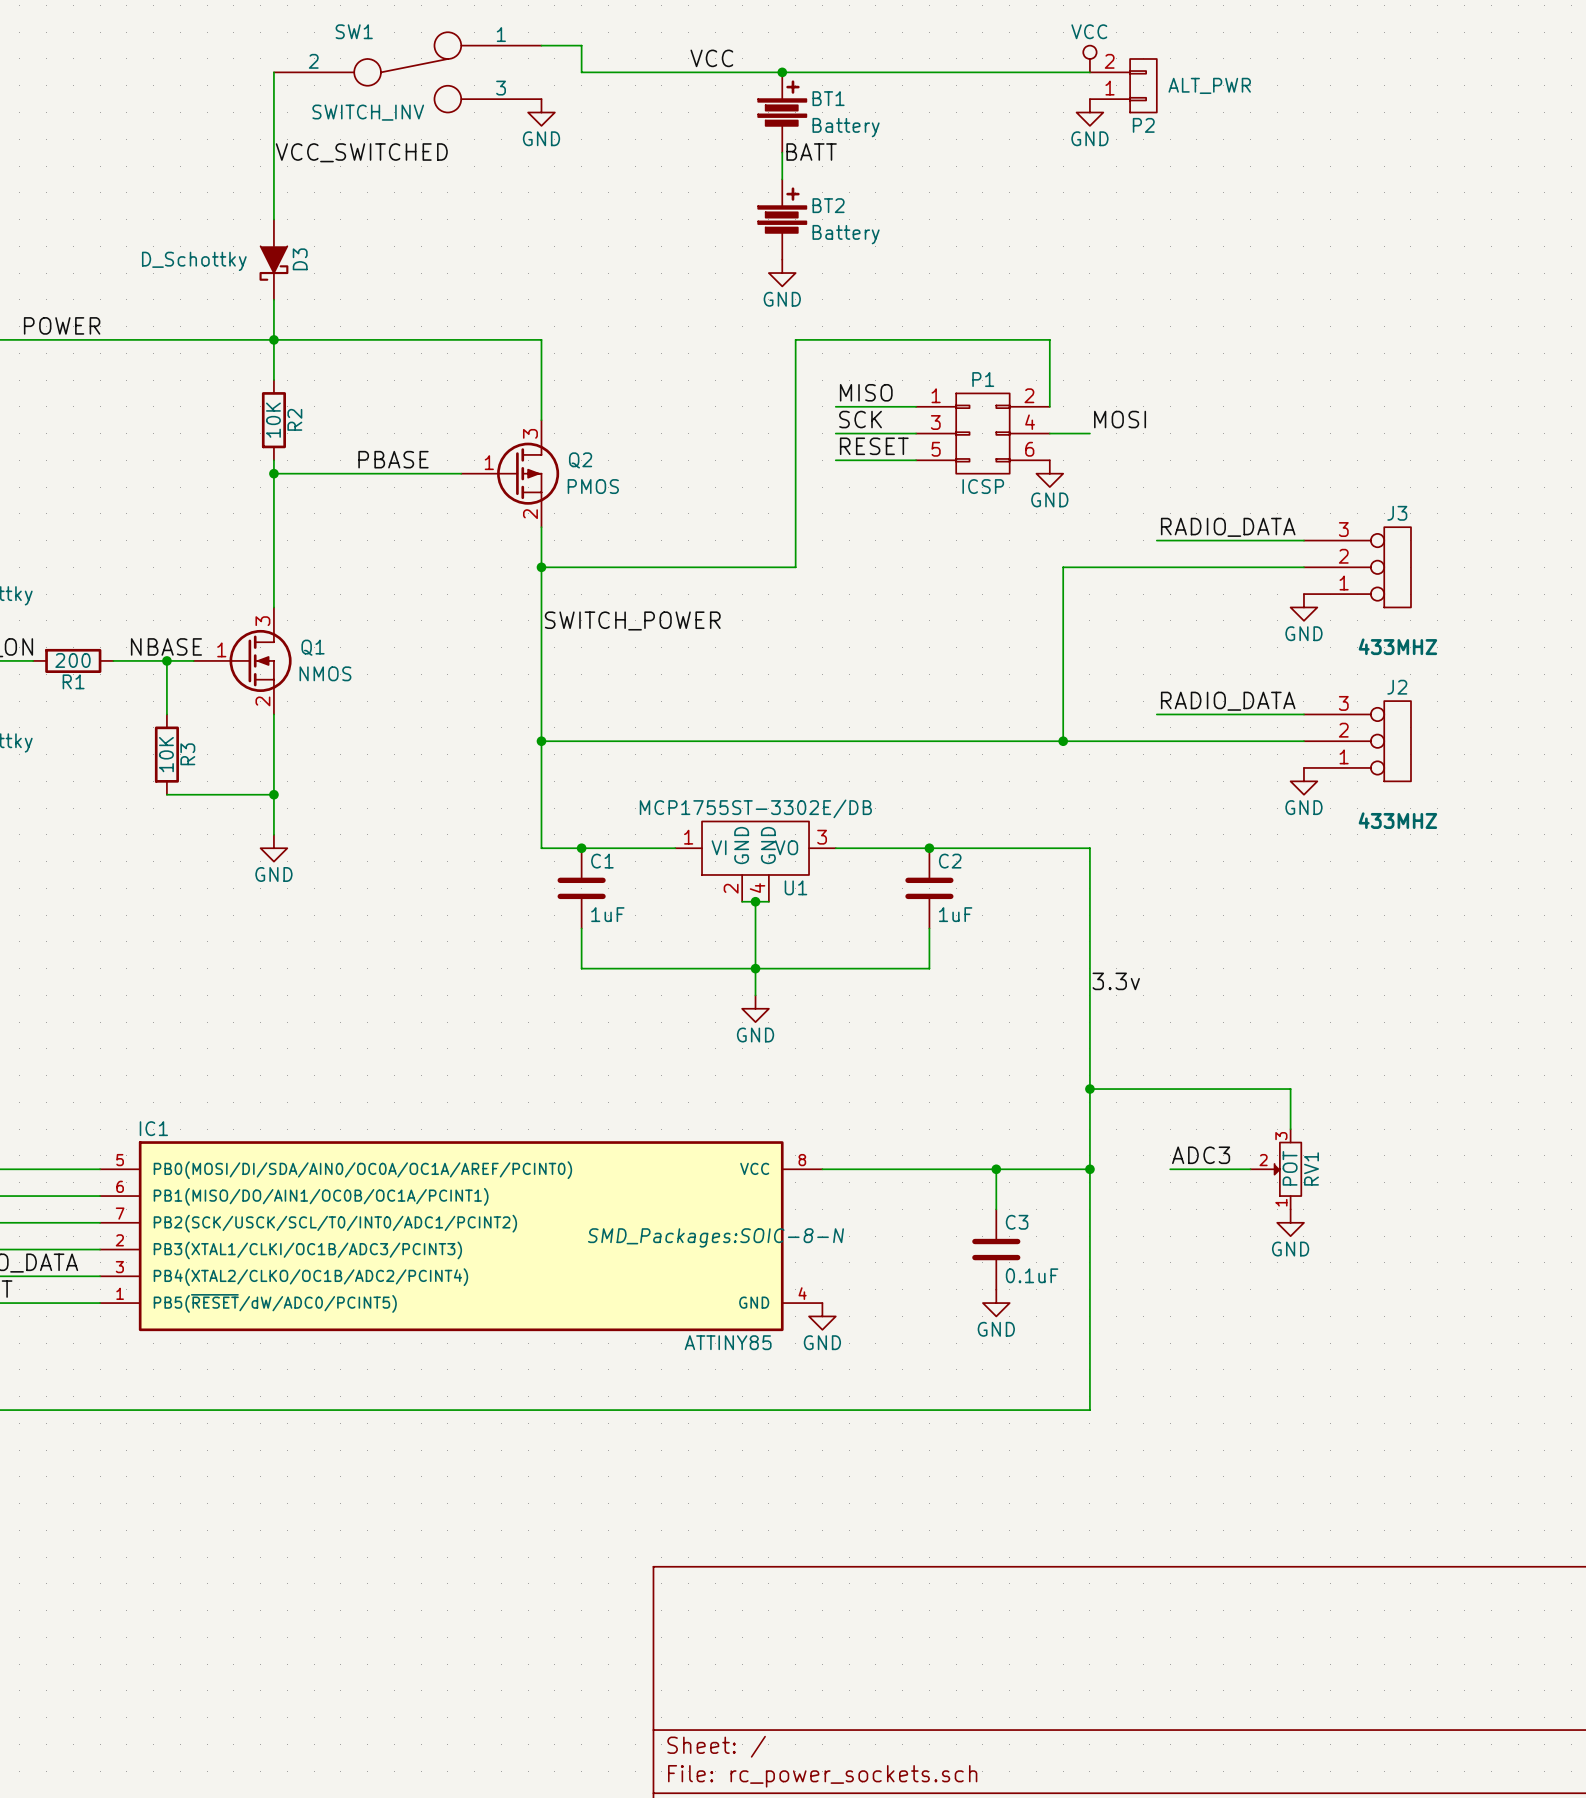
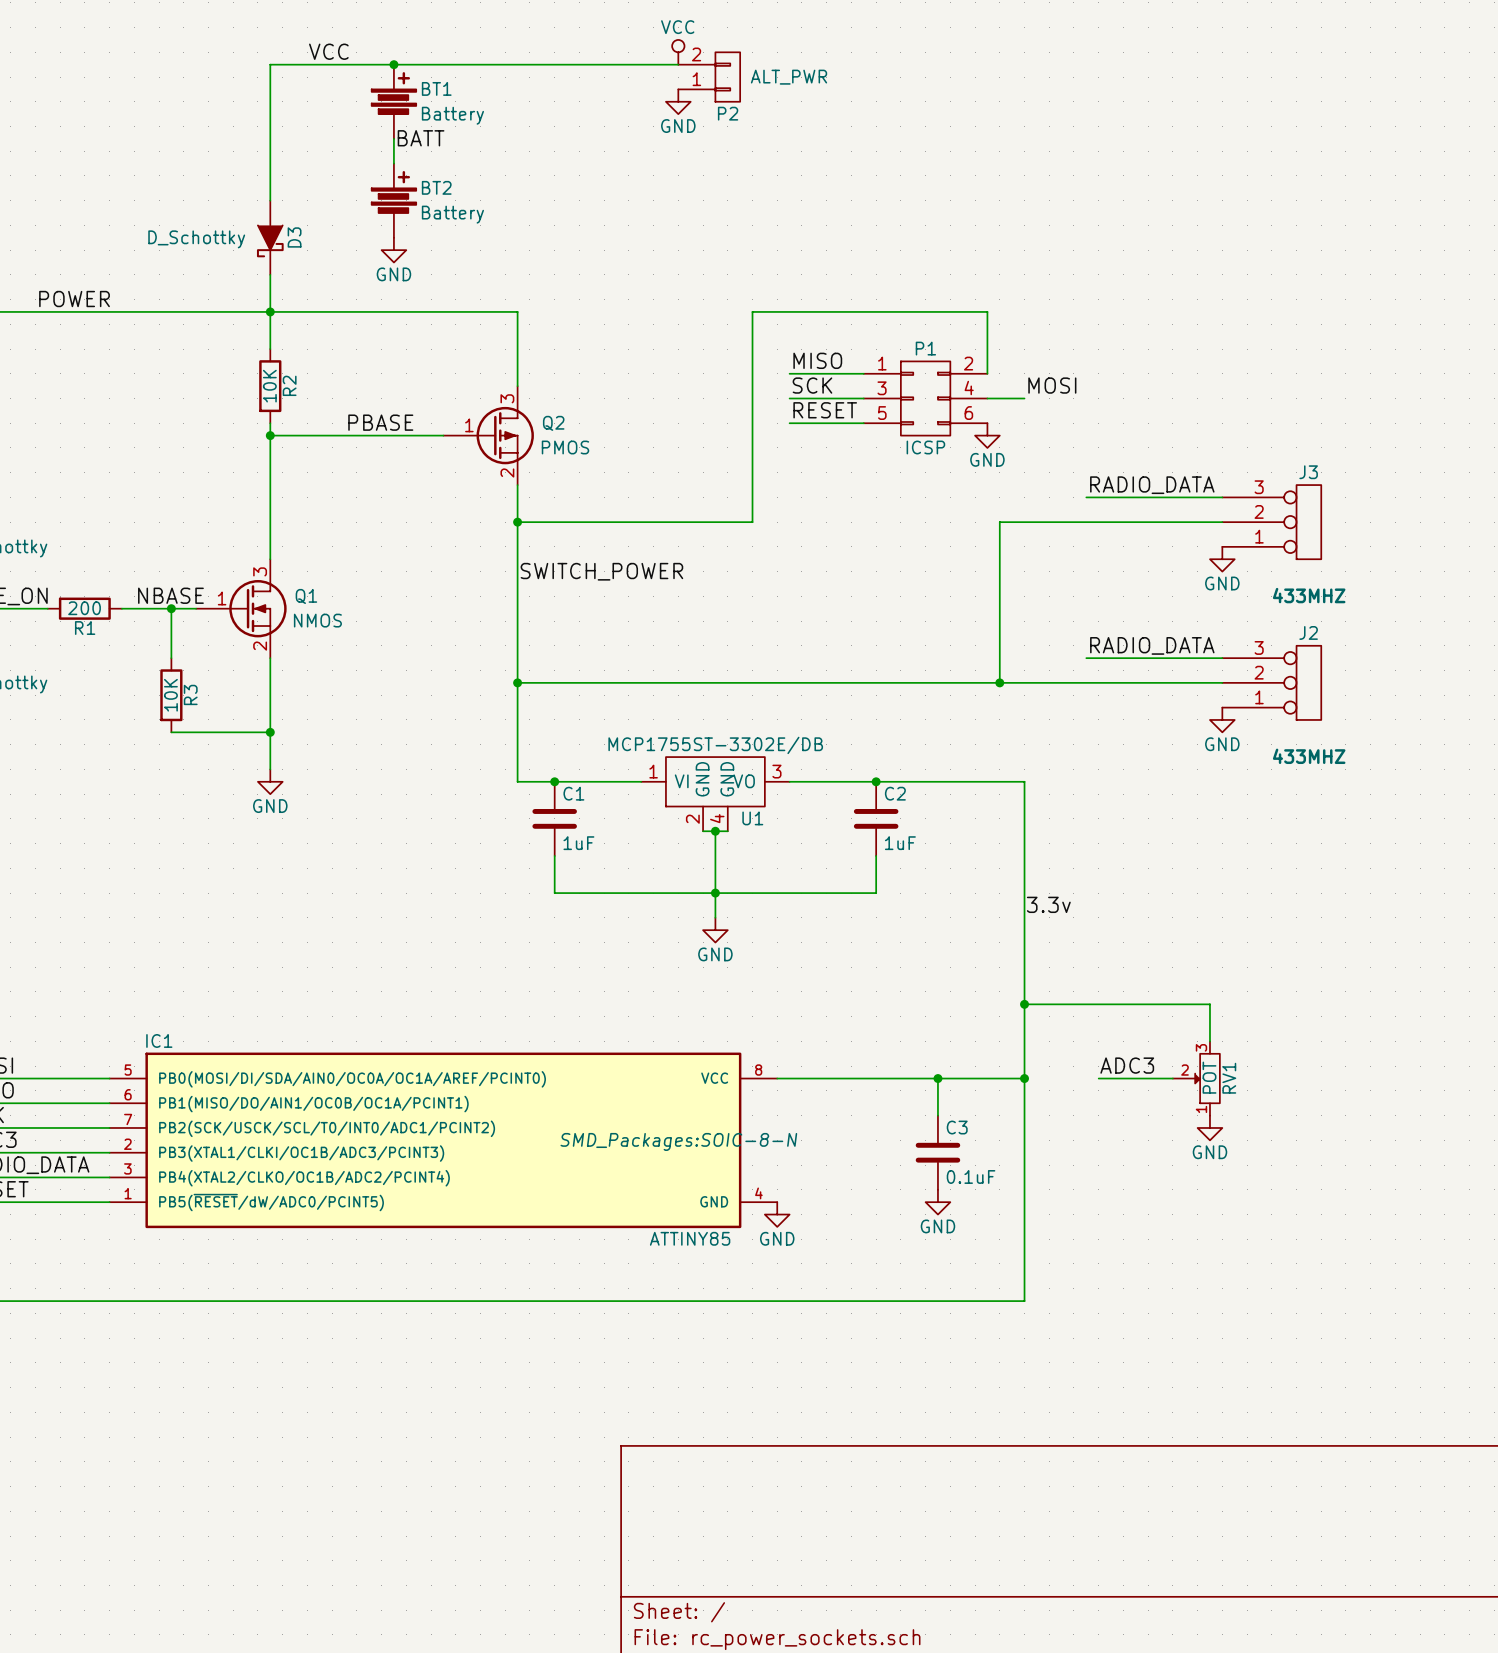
wire: (541, 45) (581, 45) (581, 72) -> (270, 64) (554, 64)
label: none -> VCC (328, 51)
label: VCC (711, 58) -> none
power symbol: none -> VCC (678, 52)
power symbol: VCC (1089, 58) -> none
SW1: SWITCH_INV (407, 72) -> none
junction: none -> (393, 64)
wire: (715, 72) (1089, 72) -> none
junction: (782, 72) -> none
P2 position: (1123, 85) -> (709, 77)
power symbol: GND (541, 112) -> none
power symbol: none -> GND (678, 101)
BT1 position: (782, 112) -> (393, 101)
power symbol: GND (1089, 112) -> none
label: VCC_SWITCHED (361, 152) -> none
wire: none -> (393, 138) (393, 163)
label: none -> BATT (421, 138)
wire: (782, 152) (782, 179) -> none
label: BATT (811, 152) -> none
BT2 position: (782, 219) -> (393, 200)
power symbol: none -> GND (393, 250)
power symbol: GND (782, 273) -> none

